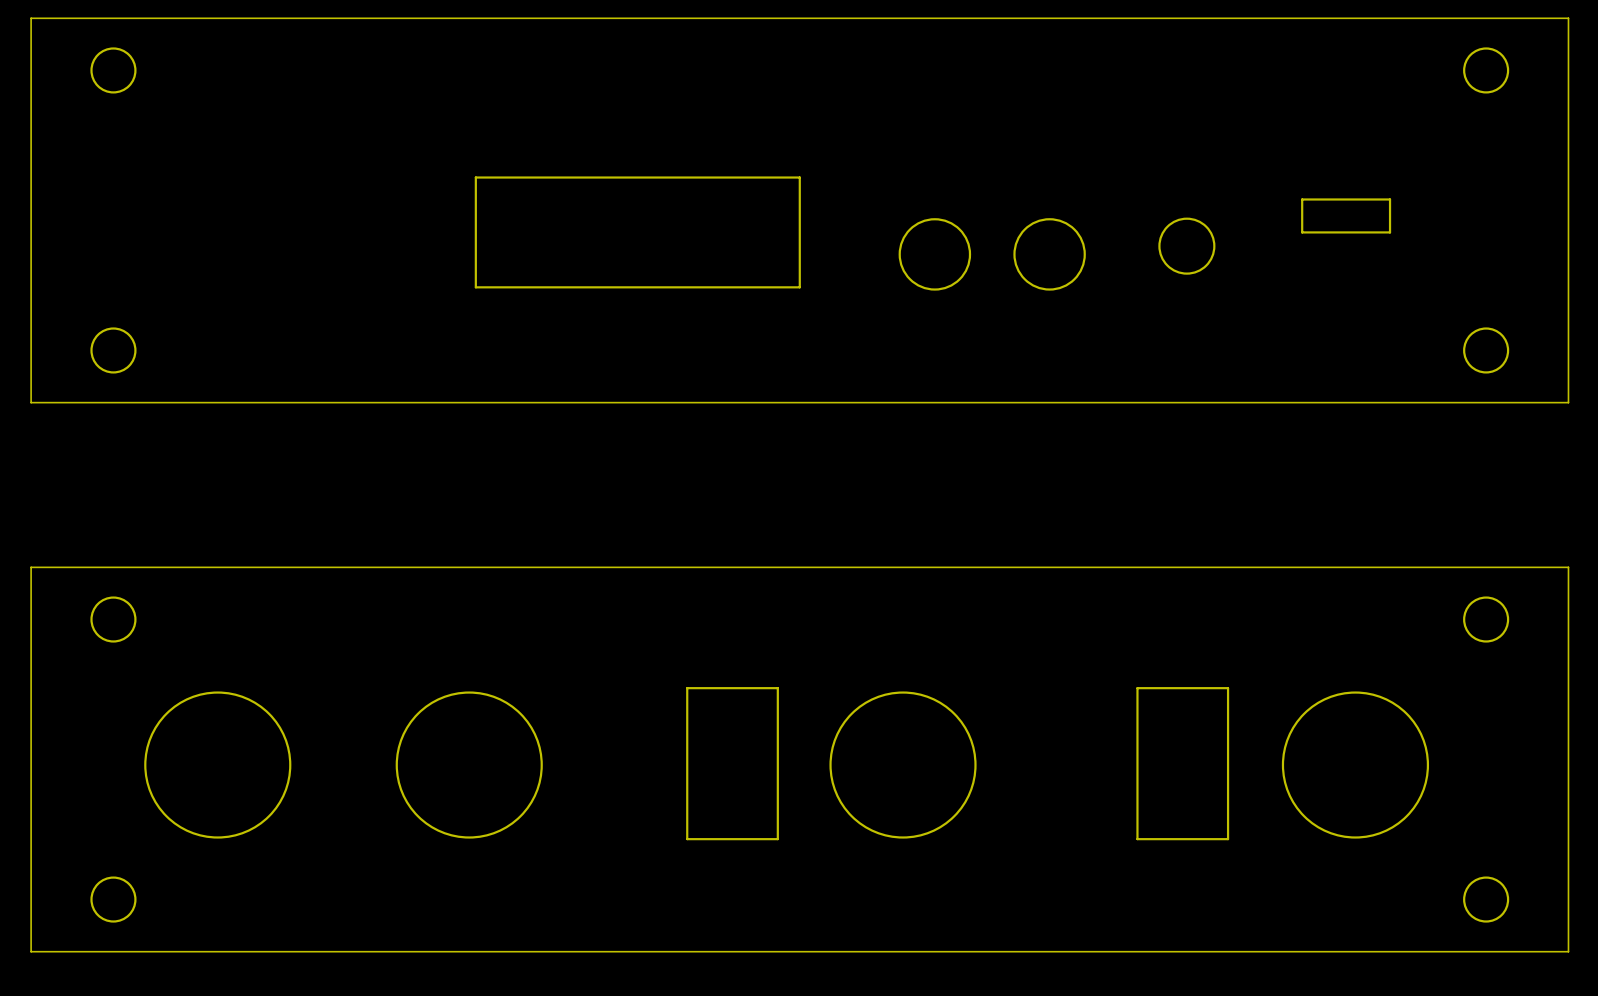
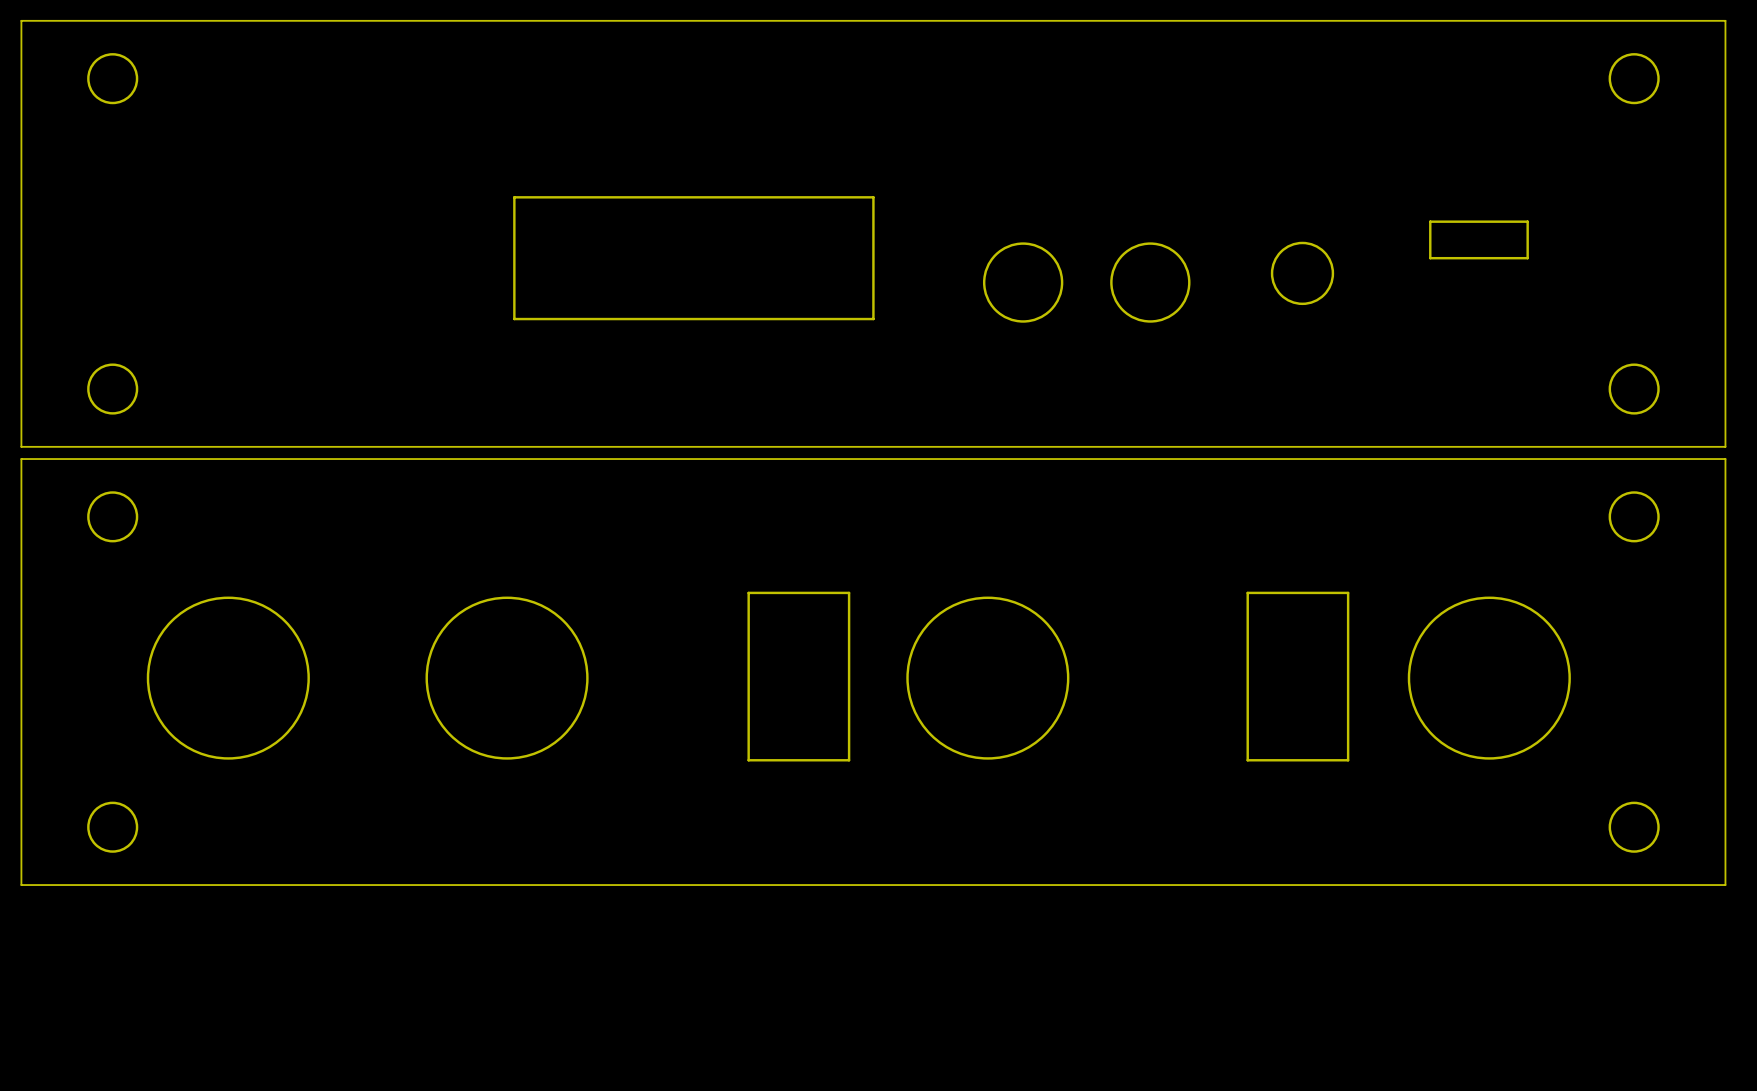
round board edge: none -> [87, 491, 139, 543]
round board edge: none -> [1608, 491, 1660, 543]
round board edge: none -> [146, 596, 310, 760]
round board edge: none -> [425, 596, 589, 760]
board edge: (1568, 567) (31, 567) -> (1725, 629) (1725, 459) (21, 459) (21, 629)
round board edge: [90, 596, 137, 643] -> none
round board edge: [1463, 596, 1510, 643] -> none
board edge: (777, 688) (687, 688) (687, 839) (777, 839) (777, 688) -> (849, 592) (748, 592) (748, 760) (849, 760) (849, 592)
board edge: (1228, 688) (1137, 688) (1137, 839) (1228, 839) (1228, 688) -> (1348, 592) (1247, 592) (1247, 760) (1348, 760) (1348, 592)
round board edge: [144, 691, 292, 839] -> none
round board edge: [395, 691, 543, 839] -> none
round board edge: none -> [87, 801, 139, 853]
round board edge: none -> [1608, 801, 1660, 853]
round board edge position: (903, 765) -> (987, 678)
round board edge position: (1355, 765) -> (1489, 678)
board edge: (1568, 797) (1568, 951) (31, 951) (31, 797) -> (1725, 885) (21, 885)
round board edge: [90, 876, 137, 923] -> none
round board edge: [1463, 876, 1510, 923] -> none

